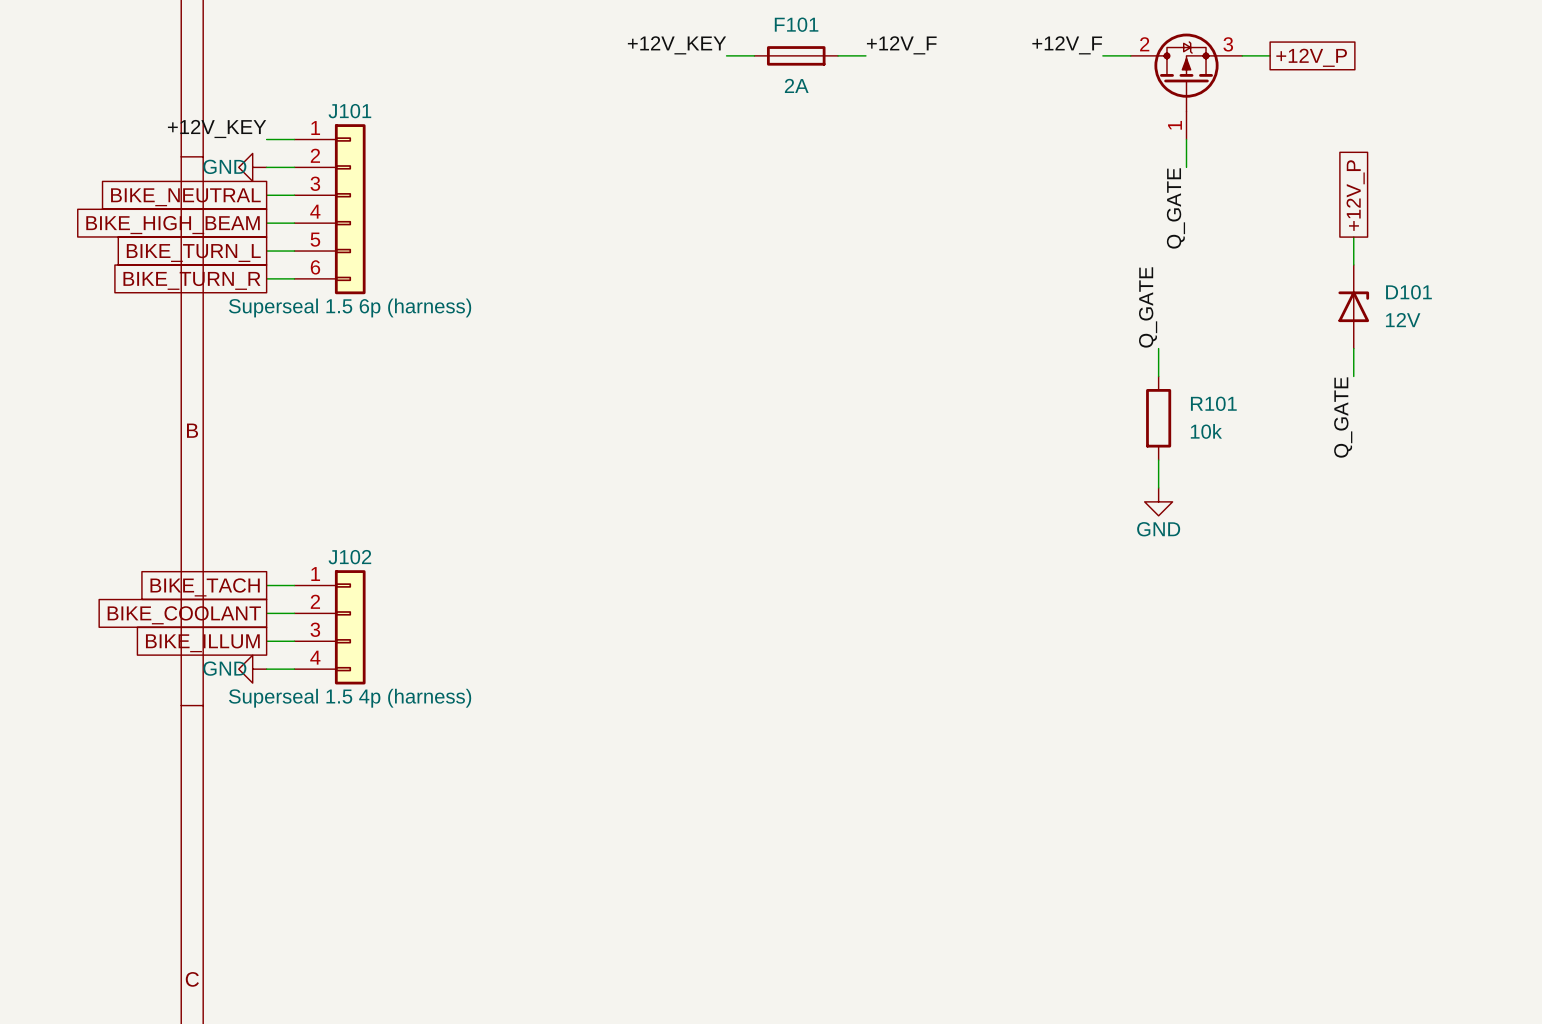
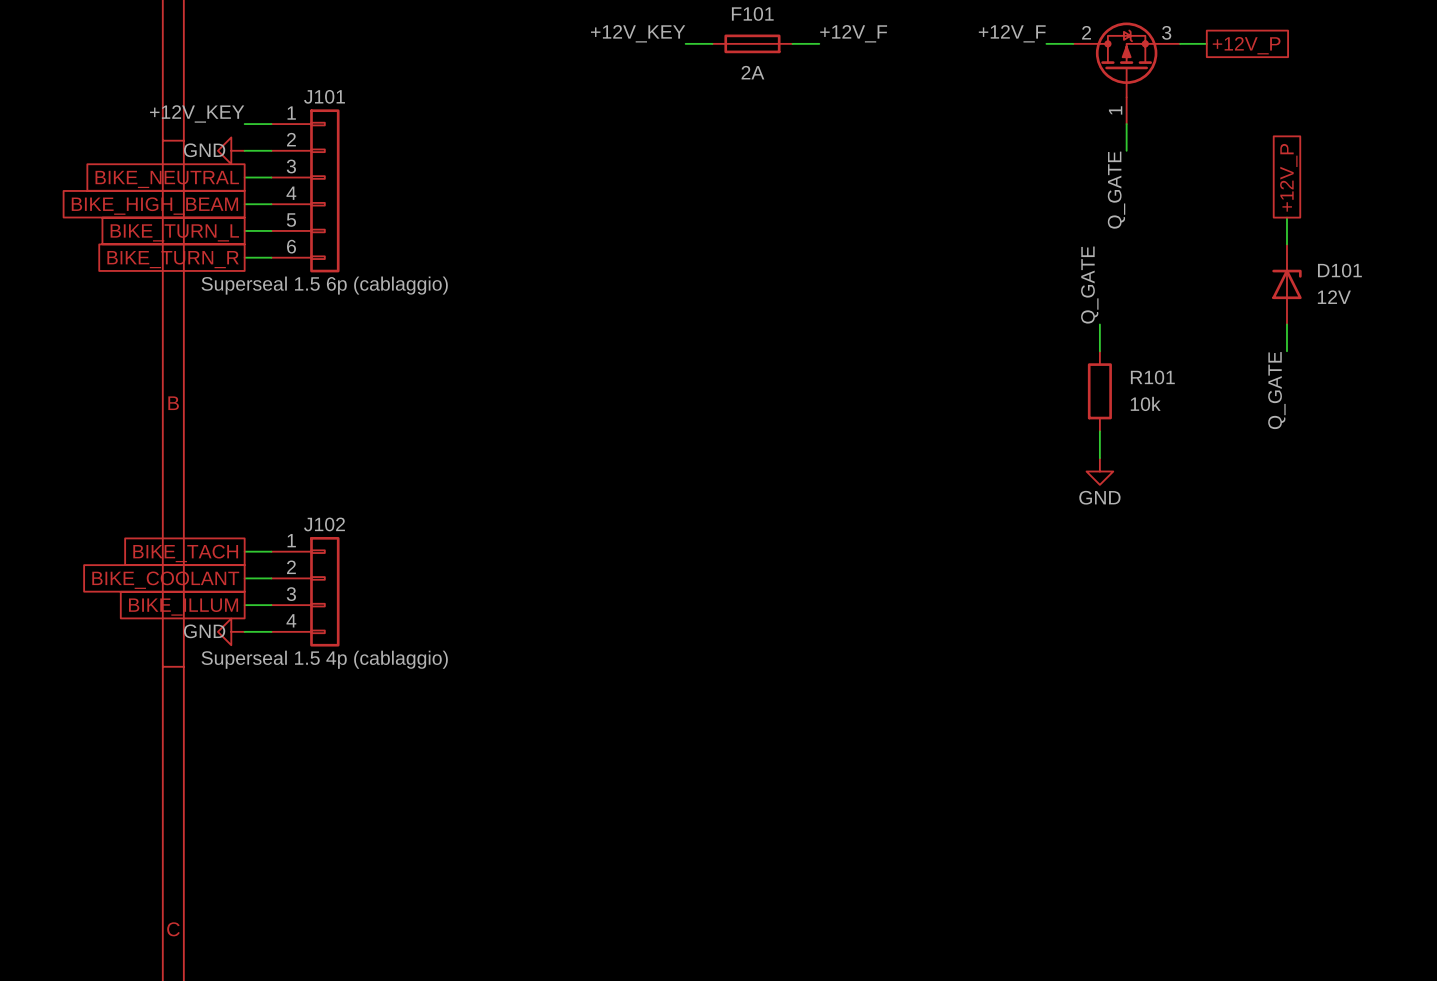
J101 value: Superseal 1.5 6p (harness) (350, 307) -> Superseal 1.5 6p (cablaggio) (324, 285)
J102 value: Superseal 1.5 4p (harness) (350, 698) -> Superseal 1.5 4p (cablaggio) (324, 659)

